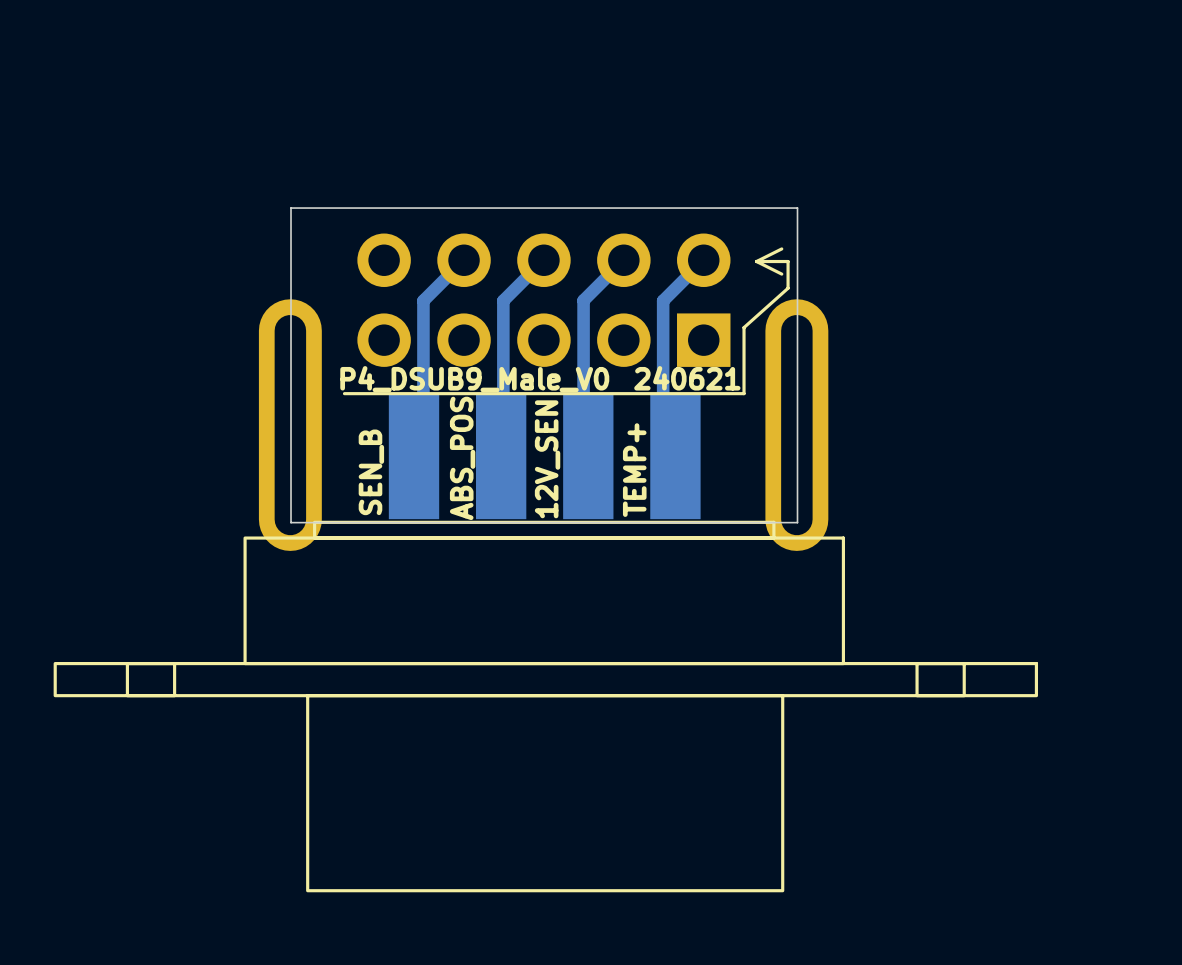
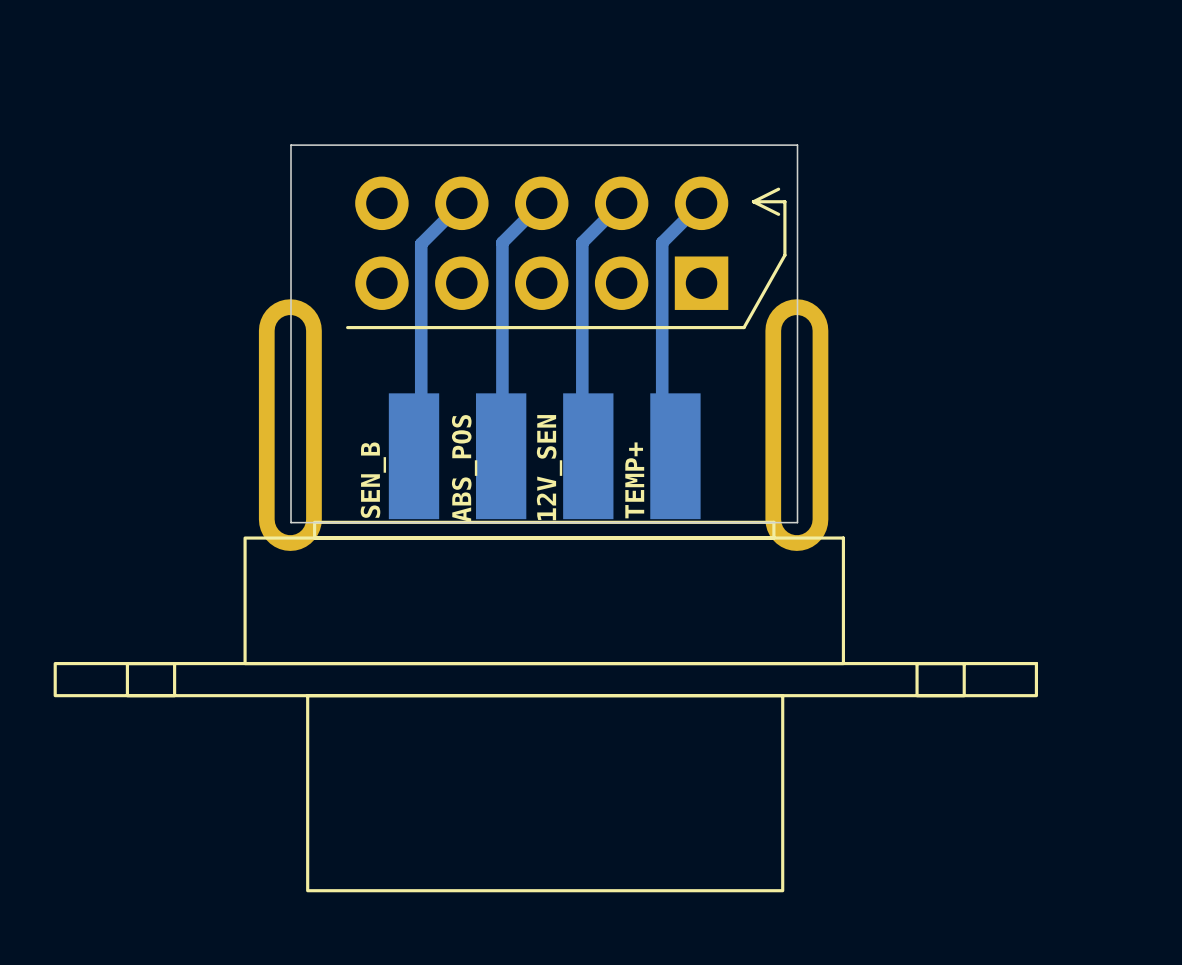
line: none -> (753, 201) (784, 201) (784, 255) (744, 327) (347, 327)
track: none -> (621, 203) (582, 242) (582, 455) (587, 460)
board edge: (797, 208) (291, 208) -> (797, 208) (797, 145) (291, 145) (291, 208)
line: (781, 248) (756, 261) -> (778, 189) (753, 201)
track: (464, 260) (423, 300) (423, 451) (421, 453) -> (461, 203) (421, 243) (421, 453)
track: (543, 260) (503, 300) (502, 459) -> (541, 203) (502, 242) (502, 459)
track: (703, 260) (663, 300) (663, 449) -> (701, 203) (662, 242) (663, 449)
line: (756, 261) (781, 274) -> (753, 201) (778, 214)
line: (756, 261) (788, 261) (788, 288) (744, 327) (744, 393) (344, 393) -> none
track: (586, 298) (623, 260) (583, 300) (583, 451) -> none
part position: (543, 300) -> (541, 243)
text: 240621 (687, 378) -> none
text: P4_DSUB9_Male_V0 (474, 379) -> none

